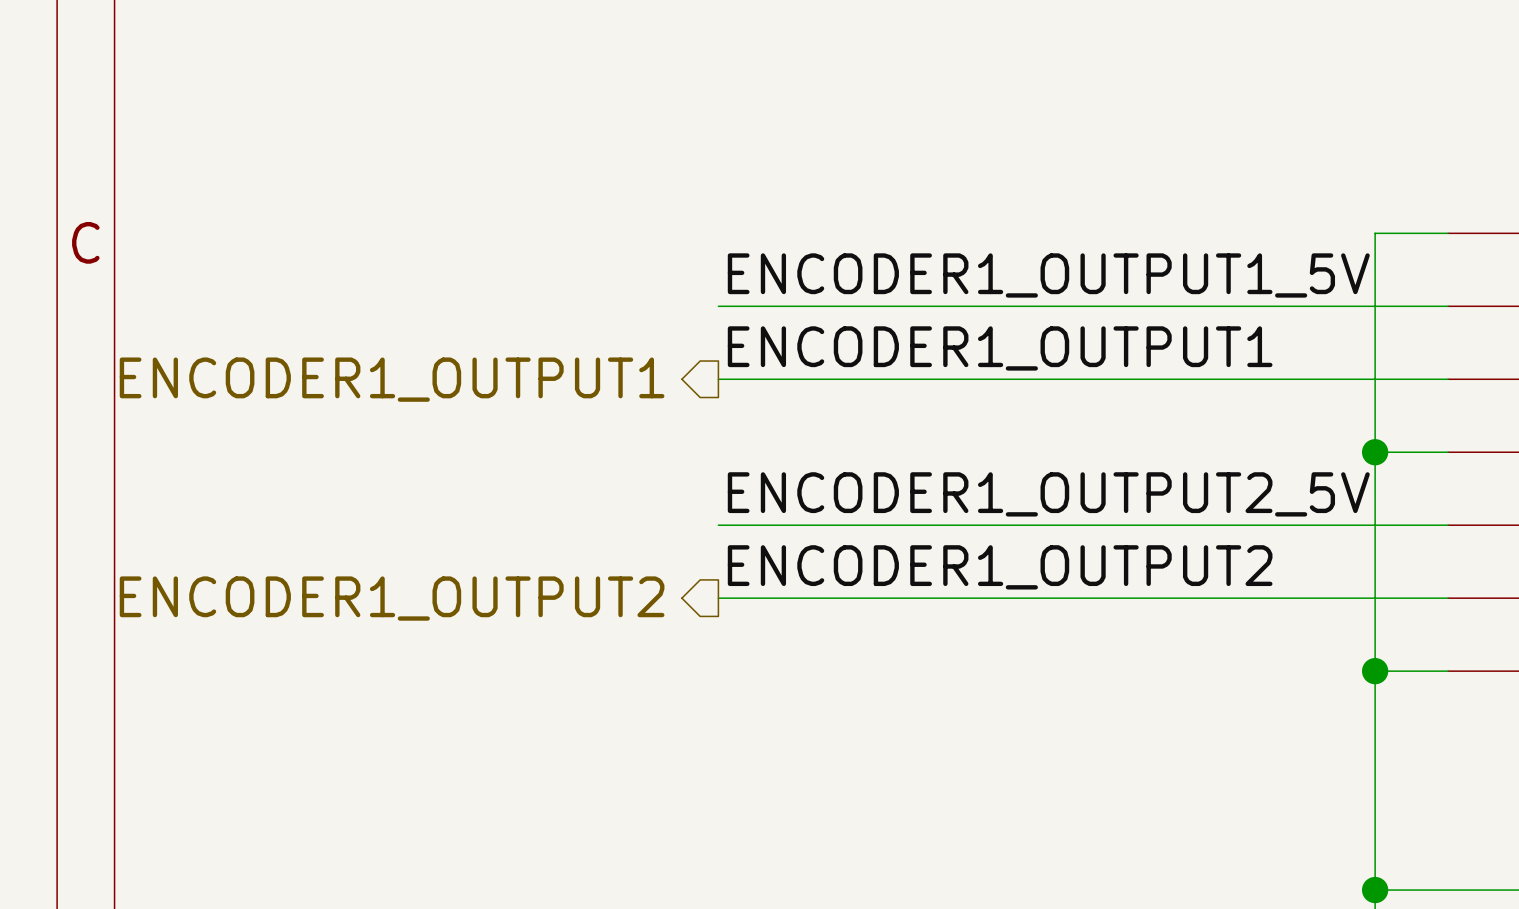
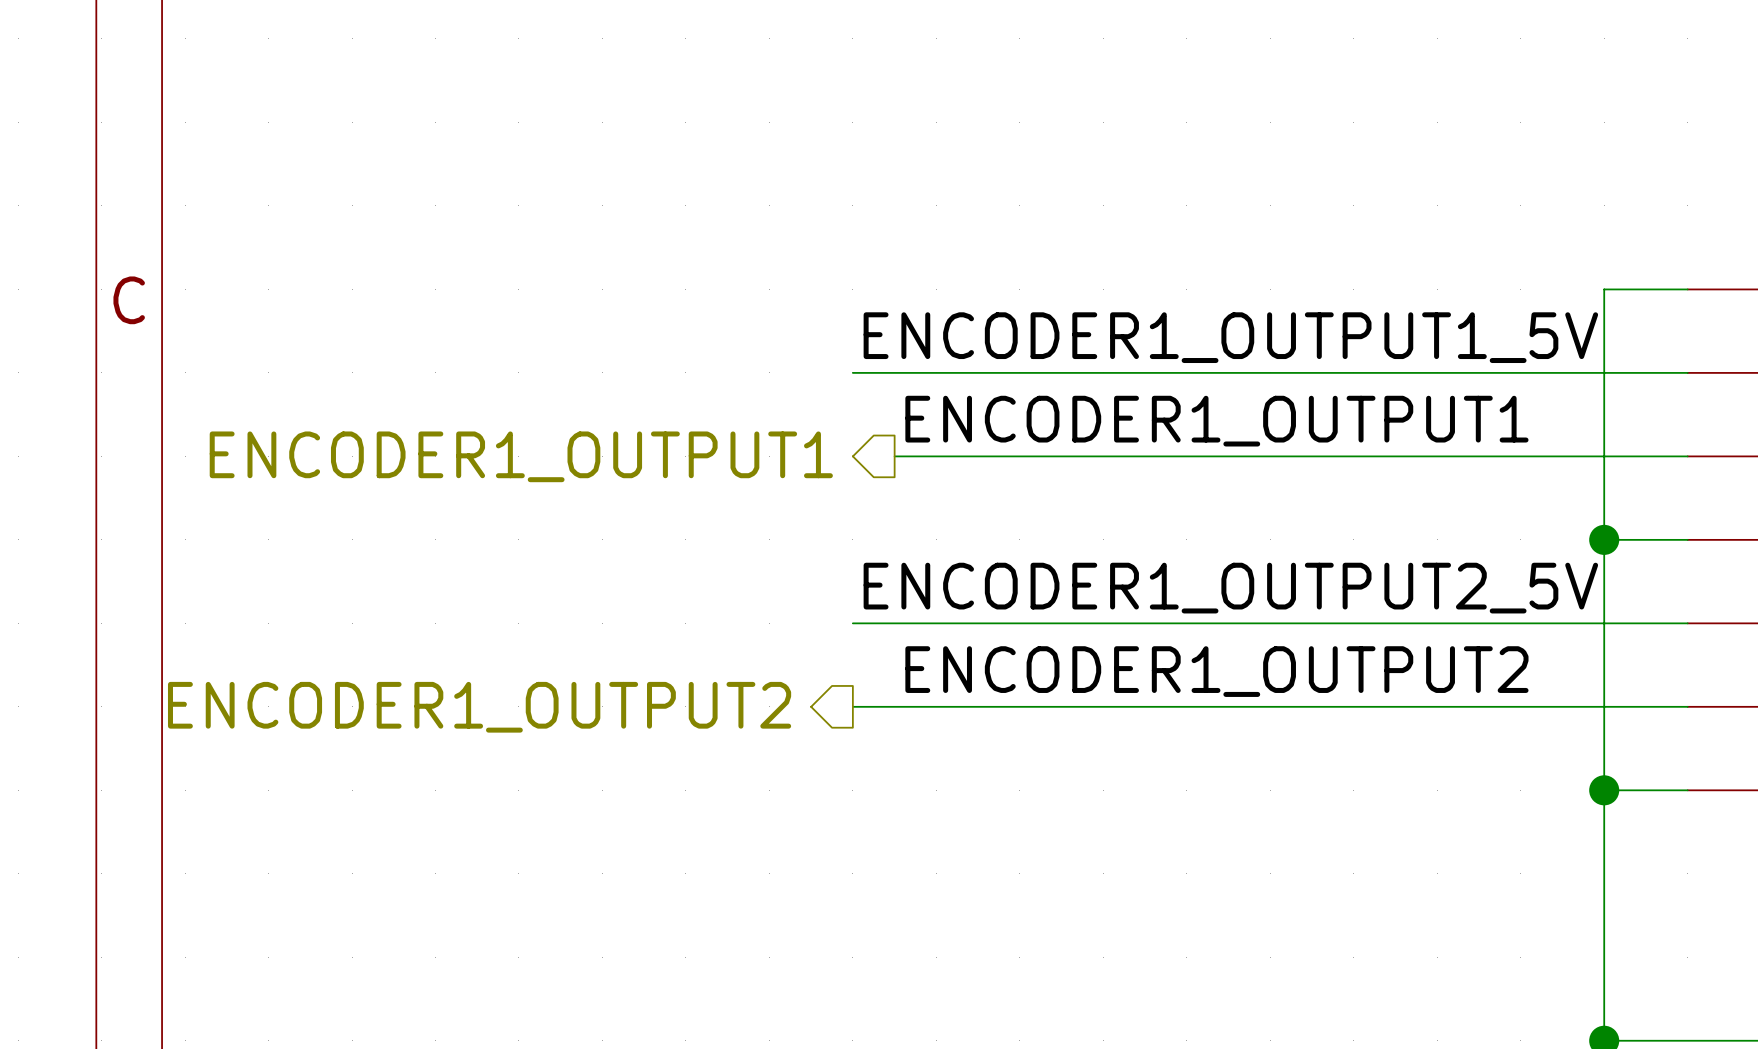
label position: ENCODER1_OUTPUT1 (1000, 348) -> ENCODER1_OUTPUT1 (1216, 421)
hierarchical label position: ENCODER1_OUTPUT1 (392, 379) -> ENCODER1_OUTPUT1 (521, 456)
wire: (718, 379) (754, 379) -> none
label position: ENCODER1_OUTPUT2 (1000, 567) -> ENCODER1_OUTPUT2 (1216, 671)

